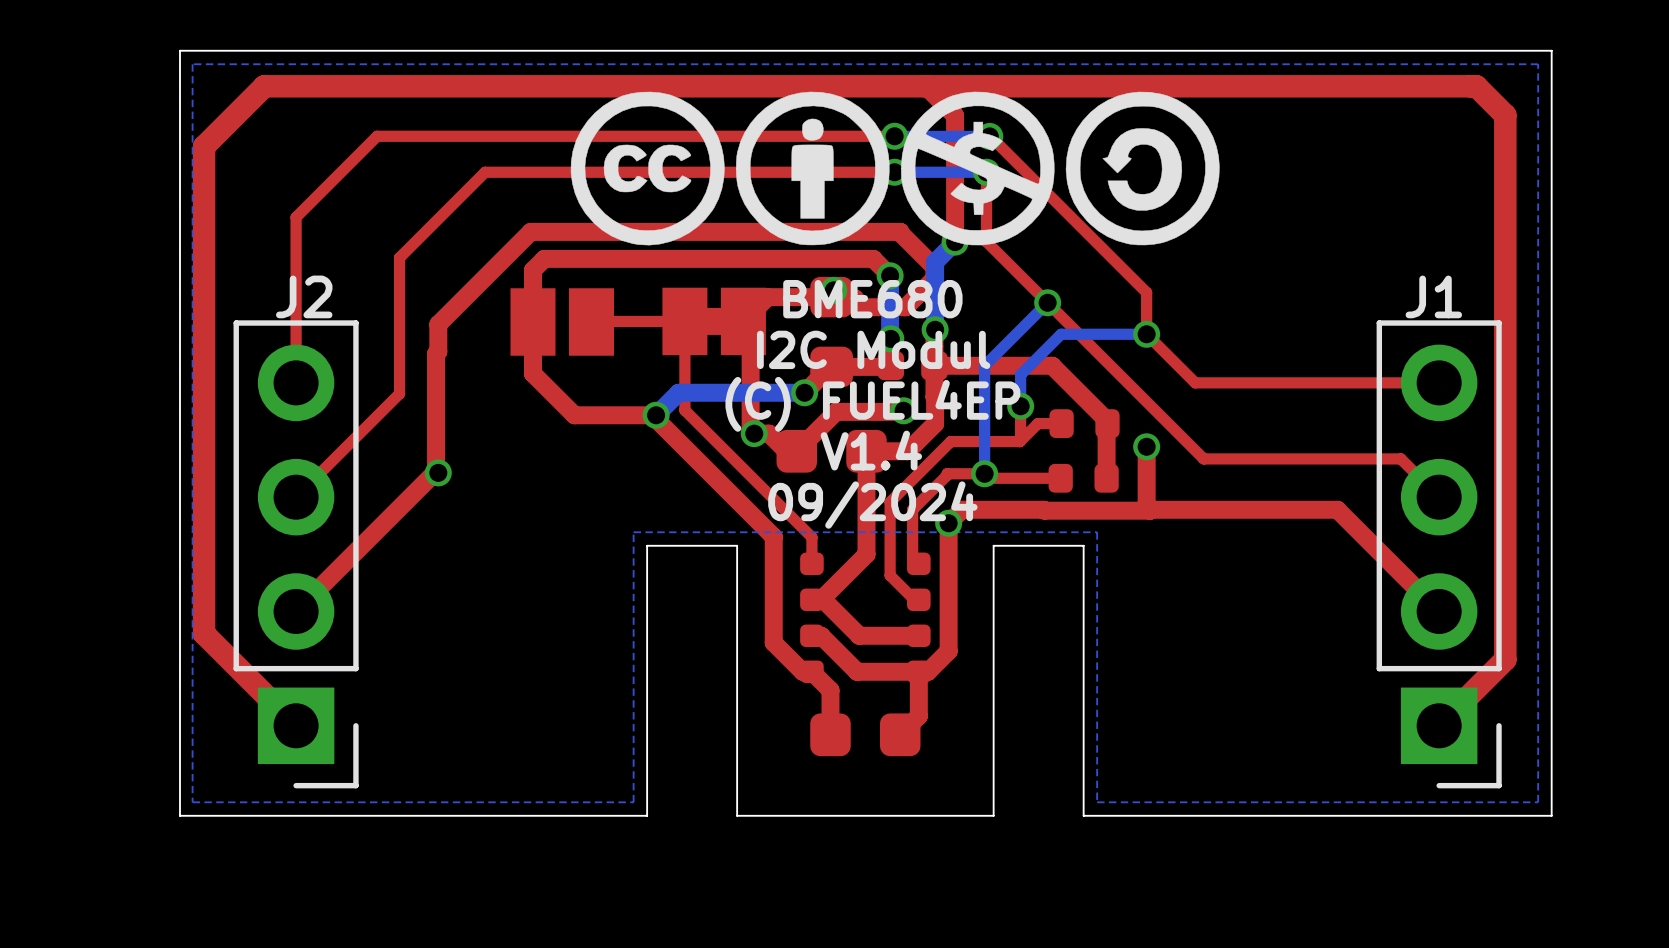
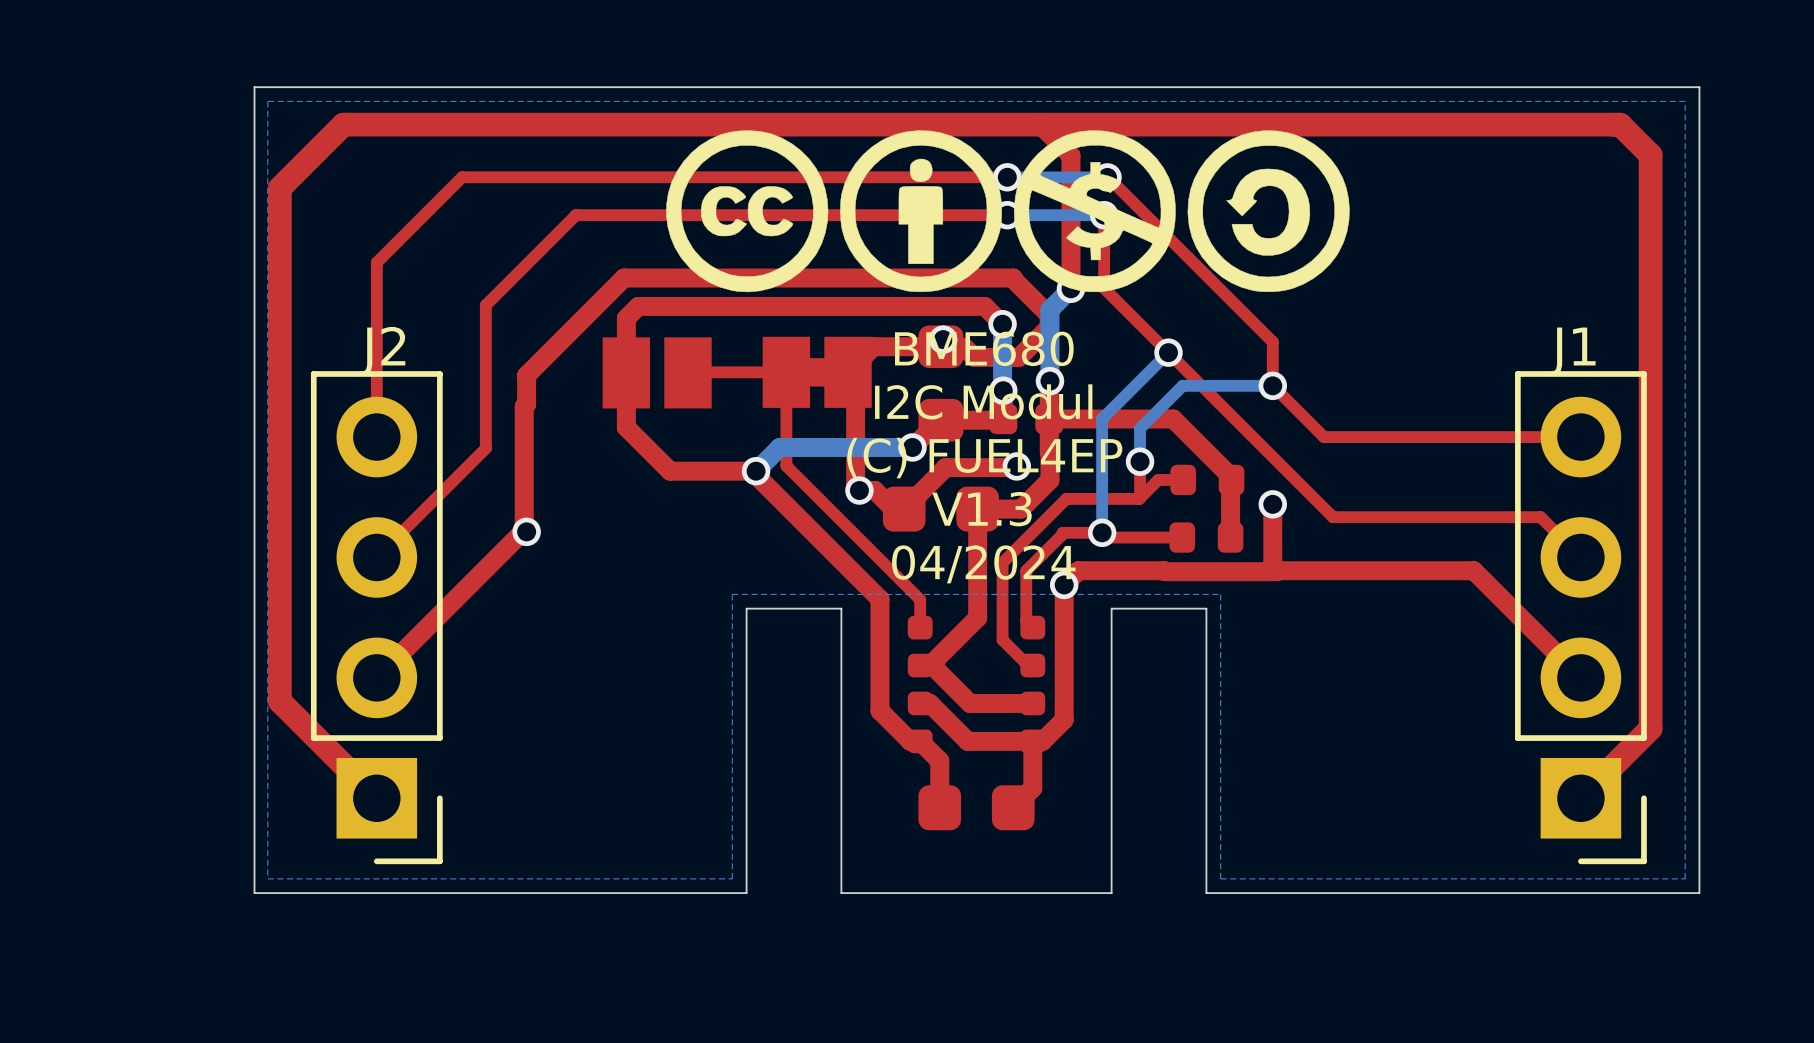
text: V1.4 (871, 450) -> V1.3 (981, 509)
text: 09/2024 (872, 505) -> 04/2024 (983, 564)

